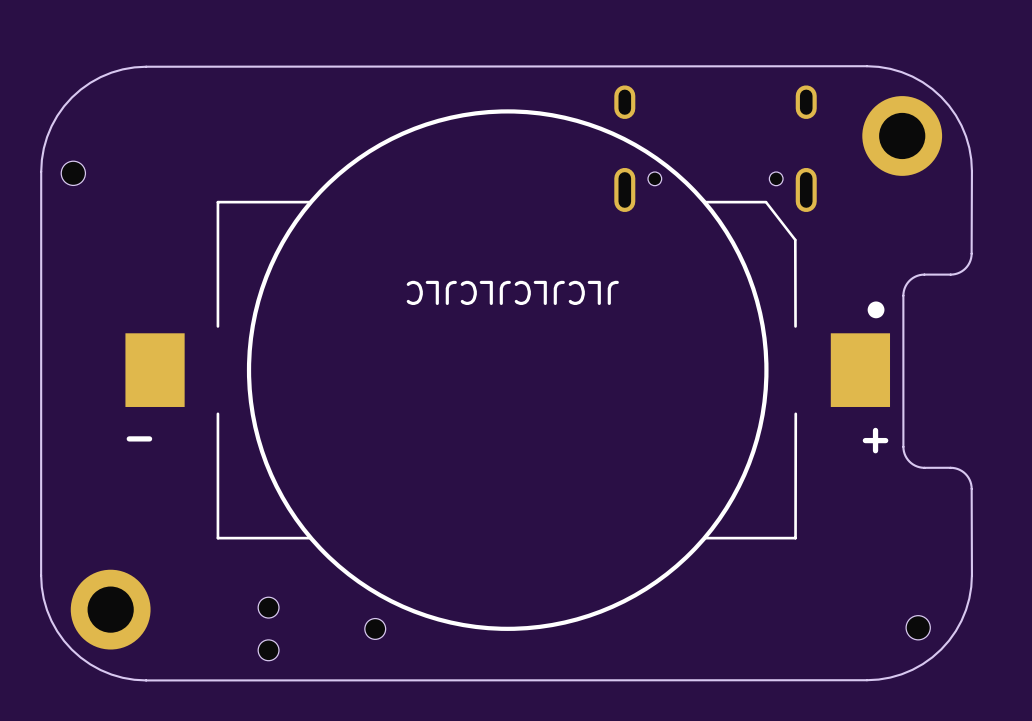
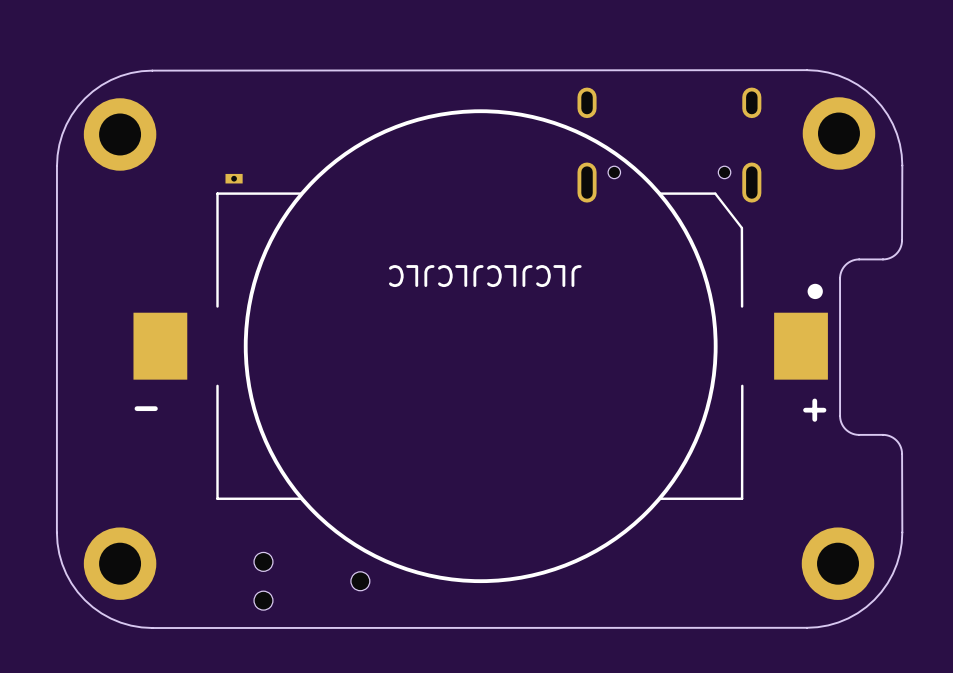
part: none -> (120, 134)
part: (73, 173) -> none
part: none -> (234, 178)
part: none -> (838, 563)
part: (918, 627) -> none

